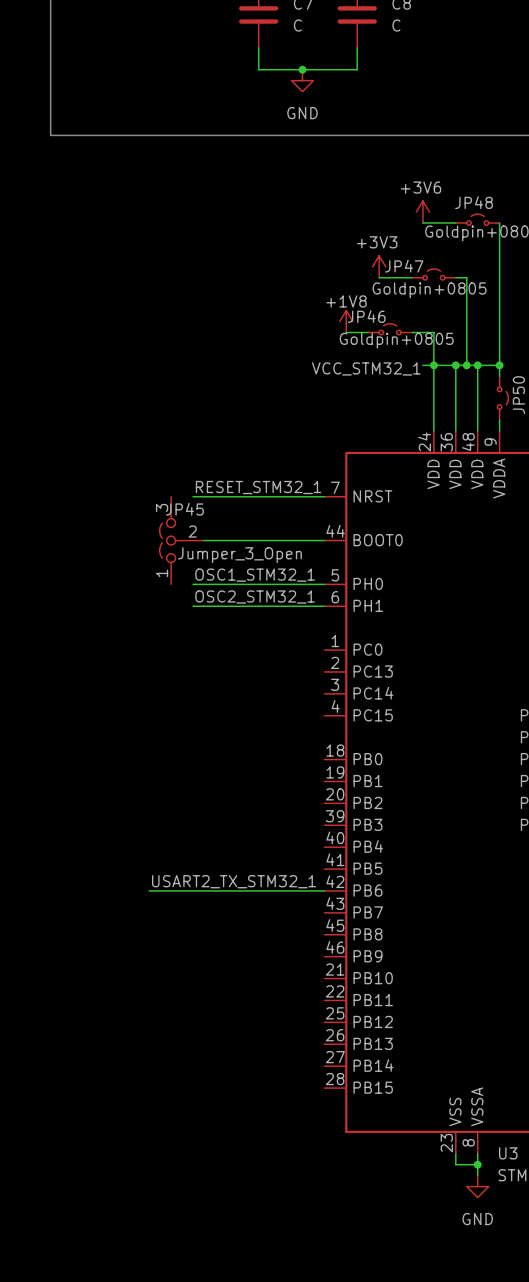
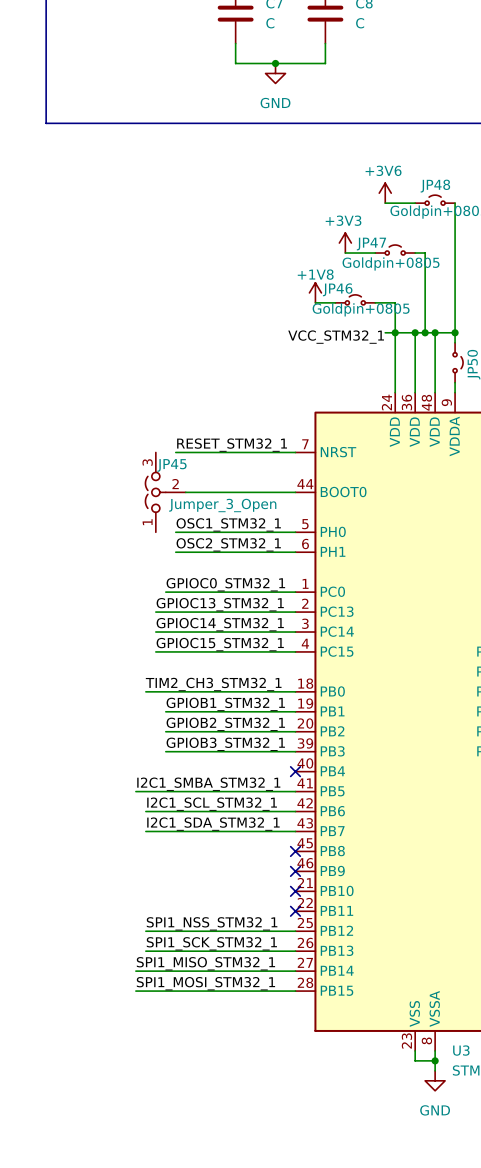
label: none -> GPIOC0_STM32_1 (225, 584)
wire: none -> (165, 592) (295, 592)
label: none -> GPIOC13_STM32_1 (220, 604)
wire: none -> (155, 612) (295, 612)
label: none -> GPIOC14_STM32_1 (220, 624)
wire: none -> (155, 632) (295, 632)
label: none -> GPIOC15_STM32_1 (220, 644)
wire: none -> (155, 651) (295, 651)
label: none -> TIM2_CH3_STM32_1 (213, 684)
wire: none -> (145, 691) (295, 691)
label: none -> GPIOB1_STM32_1 (225, 704)
wire: none -> (165, 711) (295, 711)
label: none -> GPIOB2_STM32_1 (225, 724)
wire: none -> (165, 731) (295, 731)
label: none -> GPIOB3_STM32_1 (225, 744)
wire: none -> (165, 751) (295, 751)
no-connect mark: none -> (295, 771)
label: none -> I2C1_SMBA_STM32_1 (208, 784)
wire: none -> (135, 791) (295, 791)
label: USART2_TX_STM32_1 (234, 881) -> I2C1_SDA_STM32_1 (213, 824)
label: none -> I2C1_SCL_STM32_1 (212, 804)
wire: (149, 890) (160, 890) -> none
wire: none -> (145, 831) (295, 831)
no-connect mark: none -> (295, 851)
no-connect mark: none -> (295, 871)
no-connect mark: none -> (295, 891)
no-connect mark: none -> (295, 911)
label: none -> SPI1_NSS_STM32_1 (212, 923)
wire: none -> (145, 931) (295, 931)
label: none -> SPI1_SCK_STM32_1 (211, 943)
wire: none -> (145, 951) (295, 951)
label: none -> SPI1_MISO_STM32_1 (205, 963)
wire: none -> (135, 971) (295, 971)
label: none -> SPI1_MOSI_STM32_1 (205, 983)
wire: none -> (135, 991) (295, 991)

